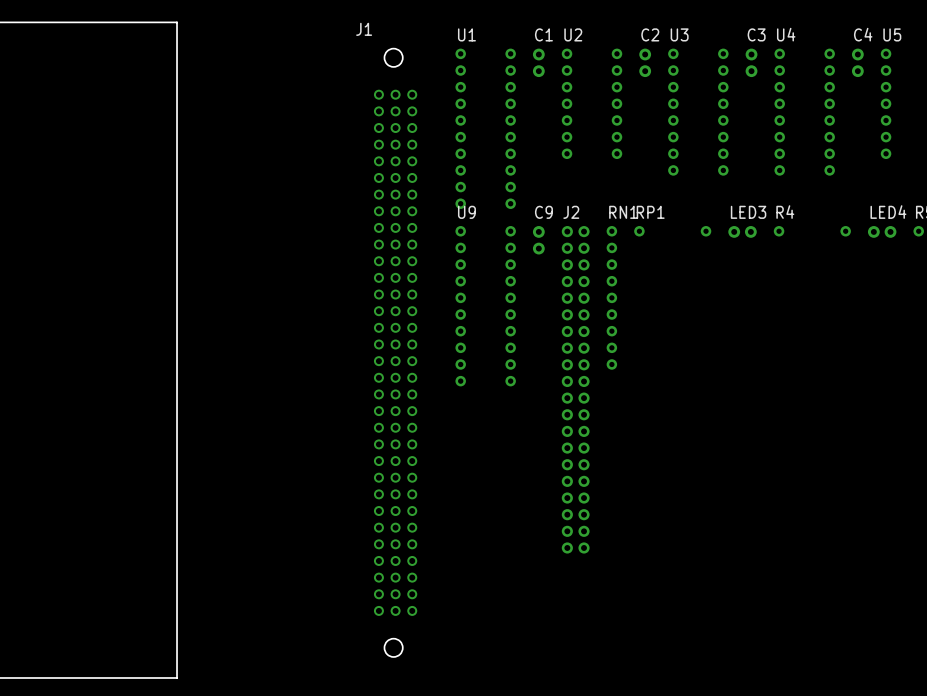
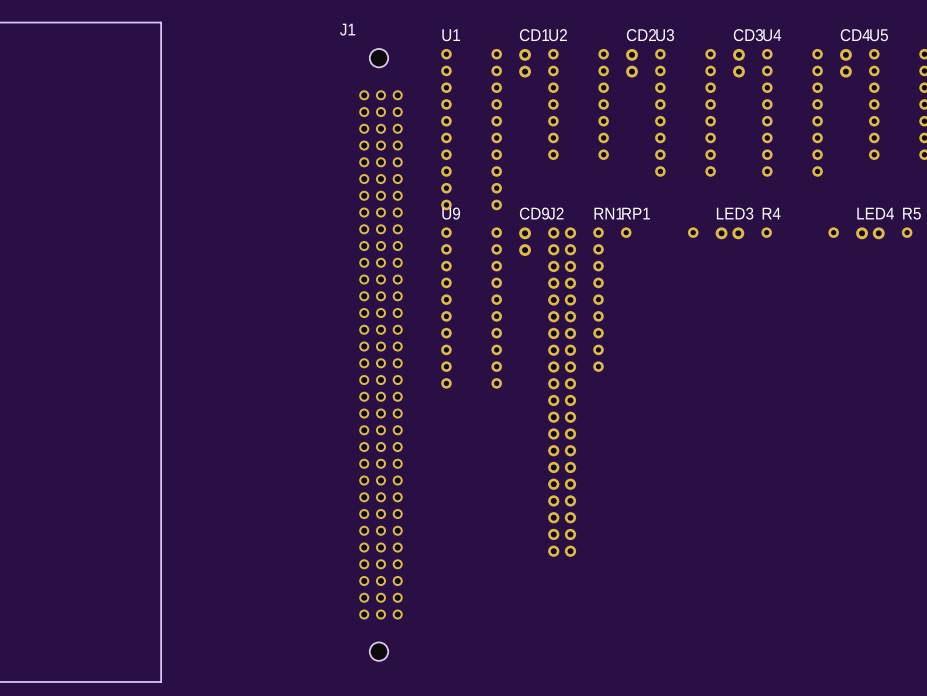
C1 name: C1 (543, 34) -> CD1 (534, 35)
C2 name: C2 (650, 34) -> CD2 (641, 35)
C3 name: C3 (756, 34) -> CD3 (748, 35)
C4 name: C4 (863, 34) -> CD4 (855, 35)
C9 name: C9 (543, 212) -> CD9 (534, 213)

